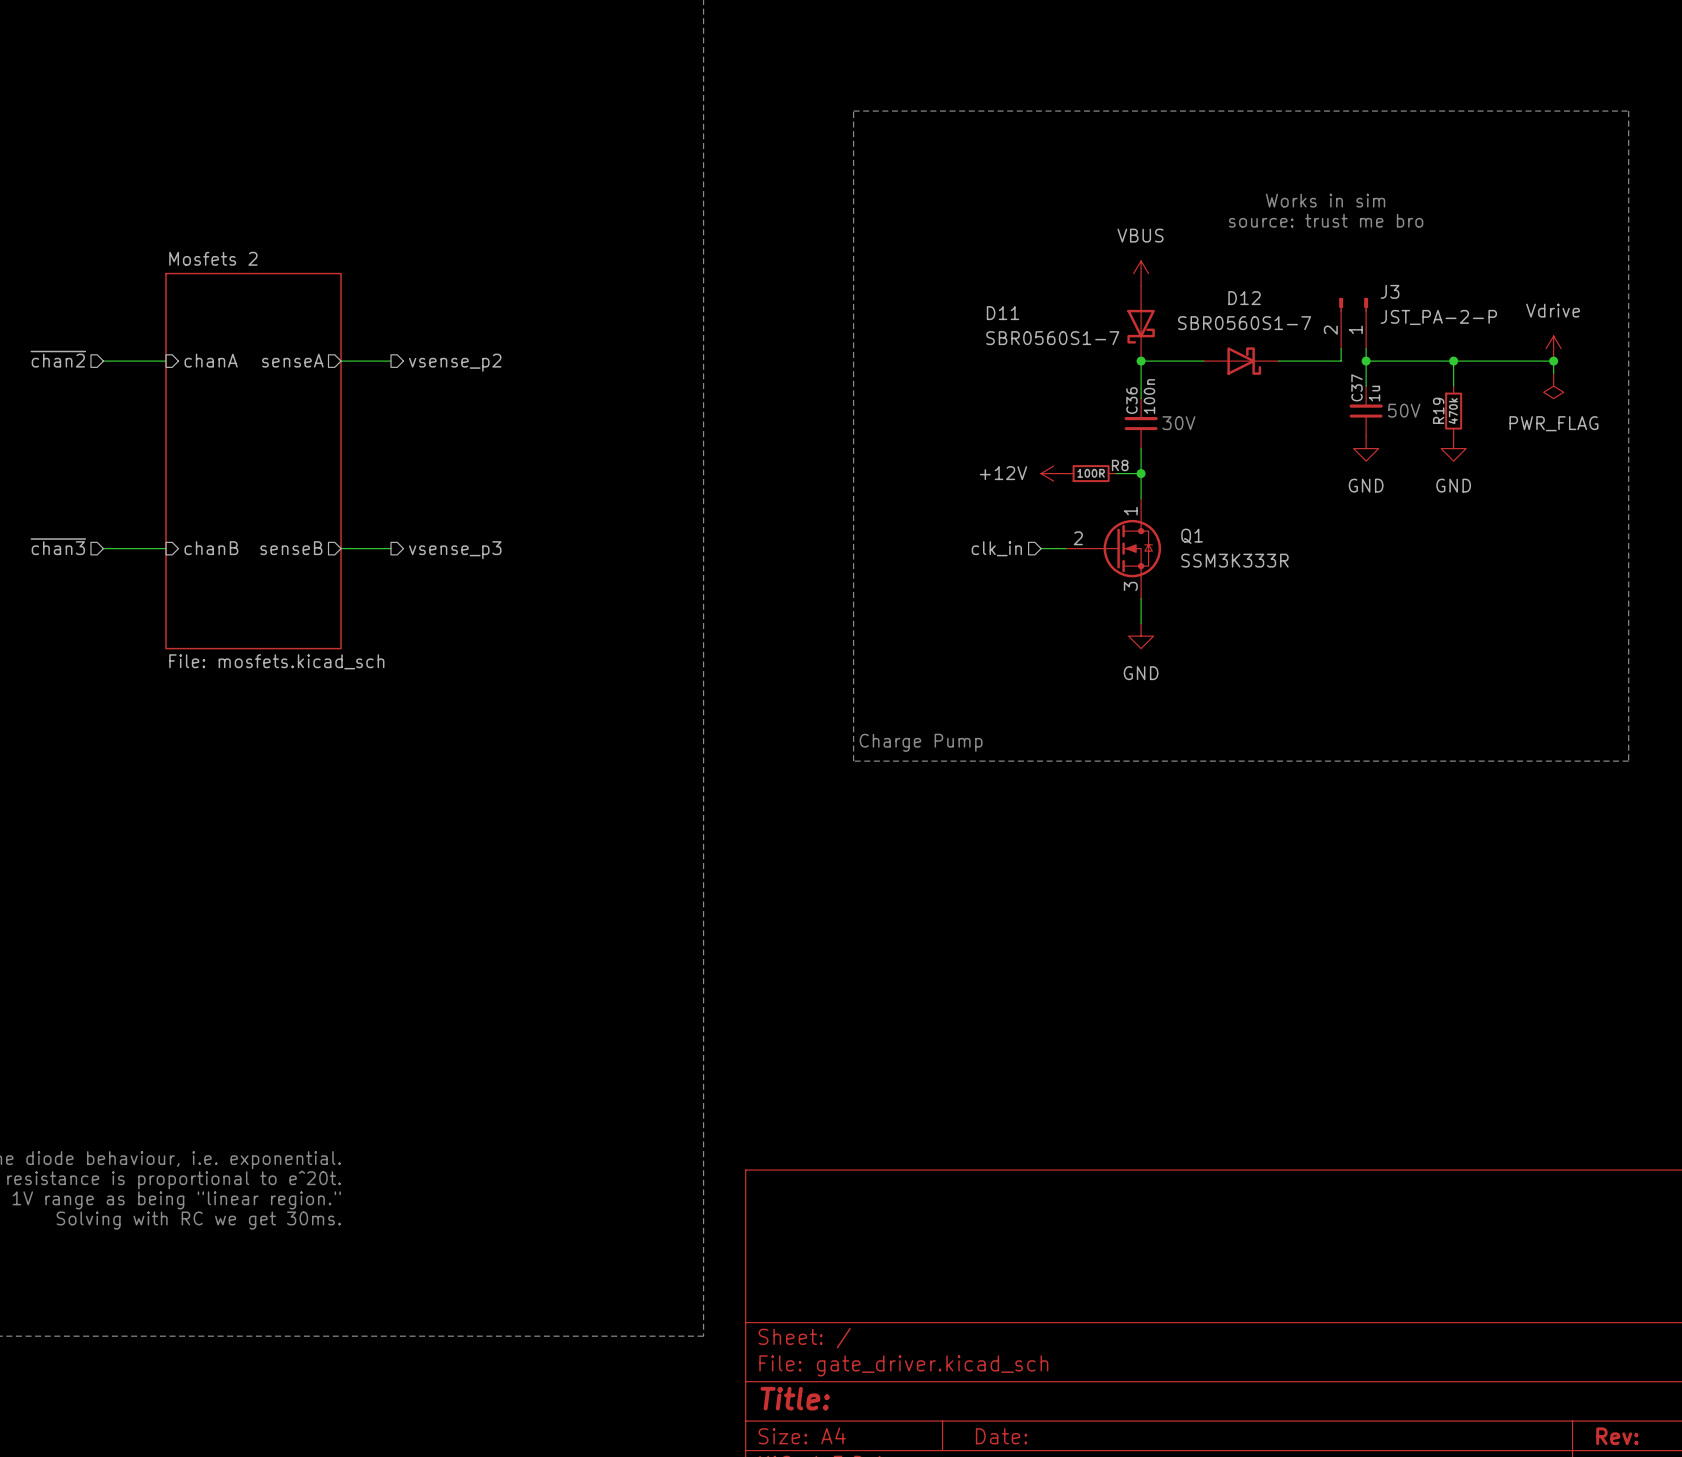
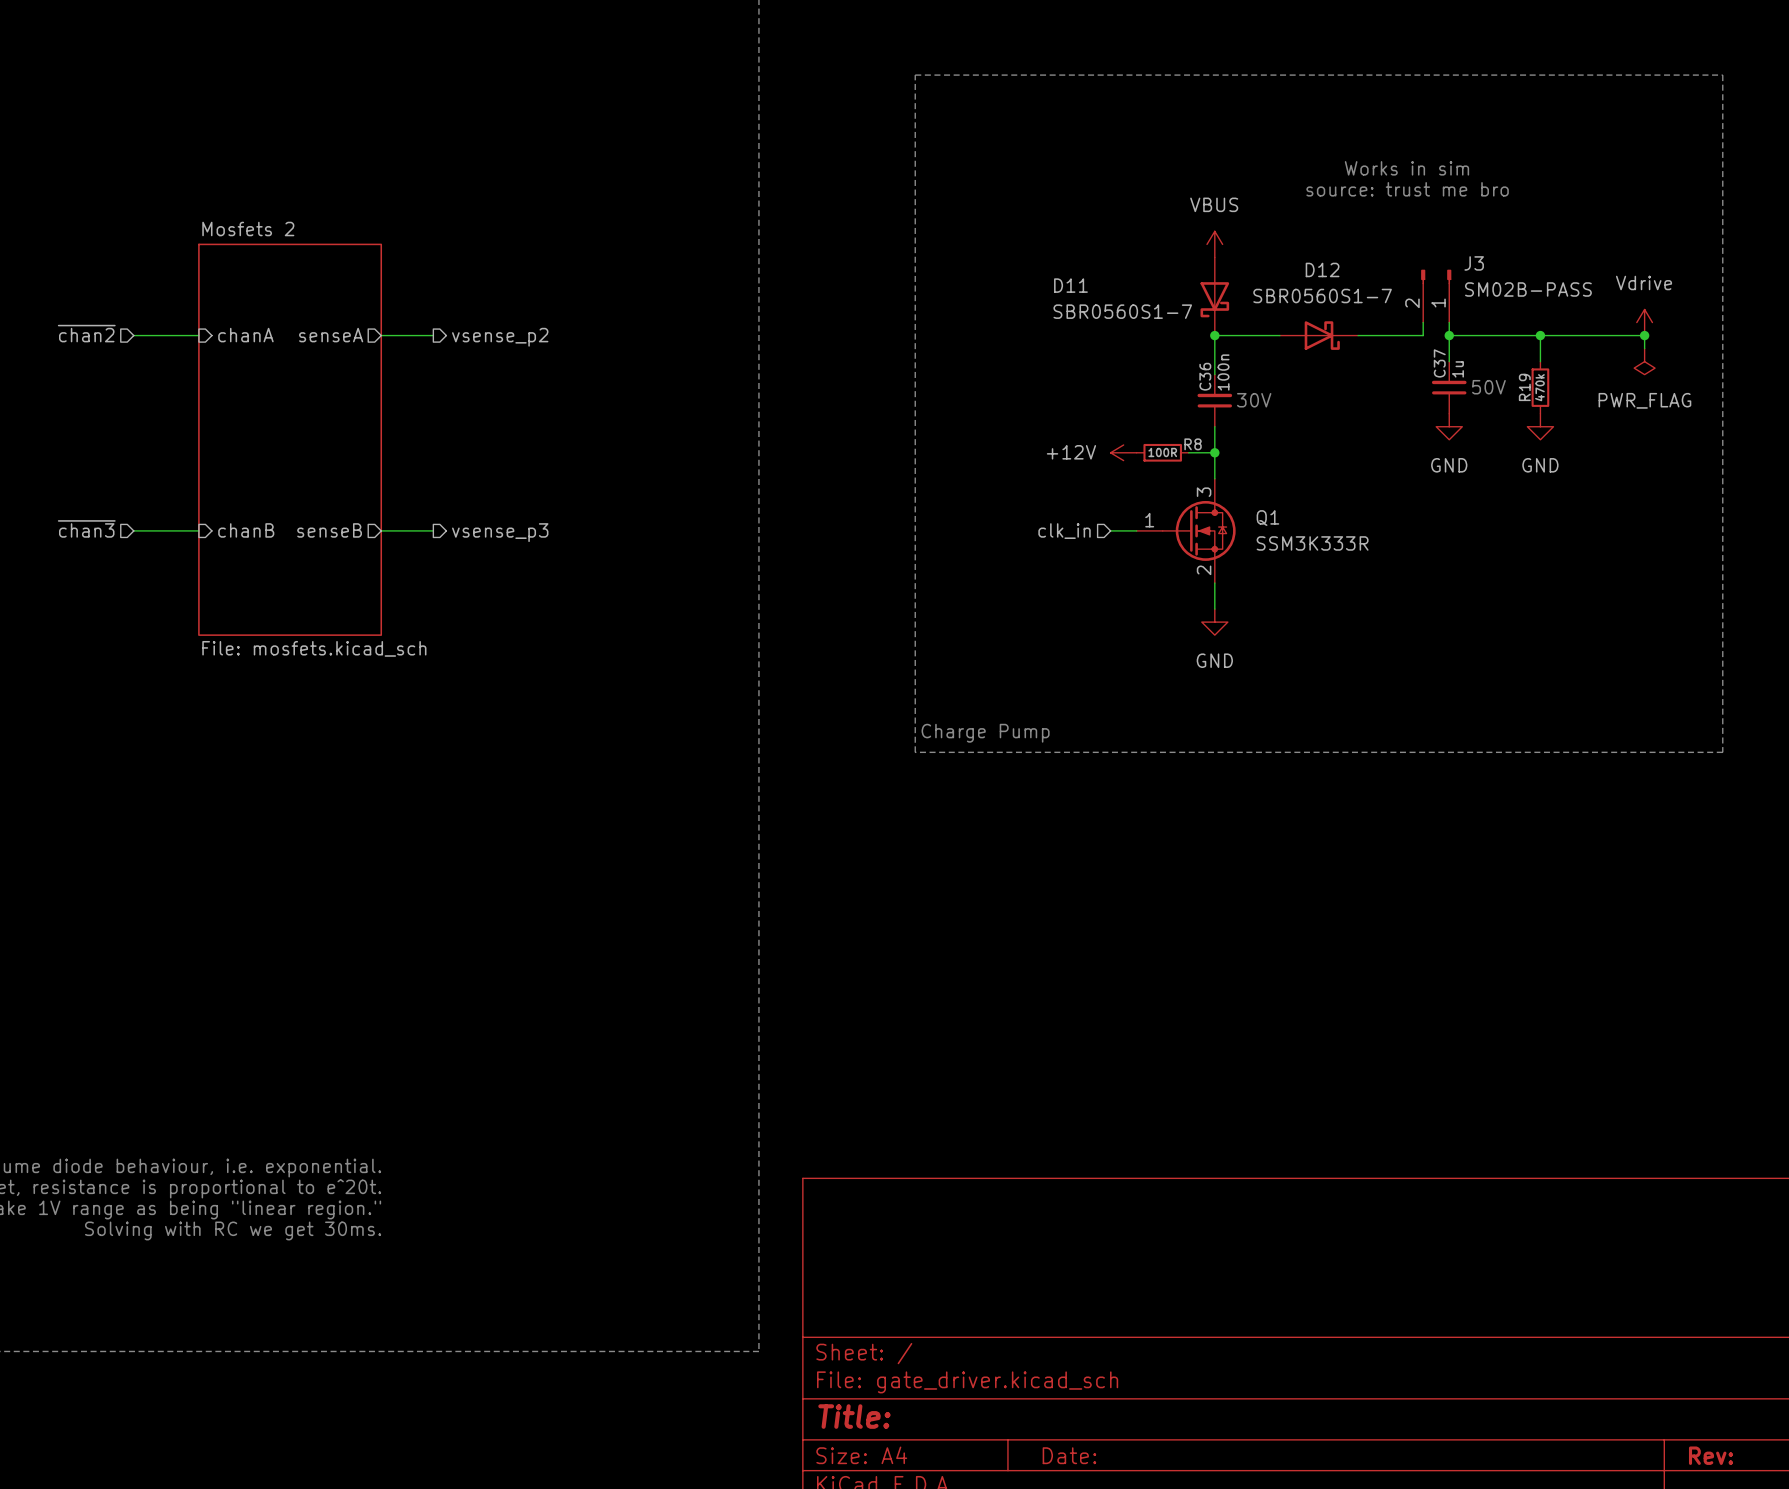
J3 value: JST_PA-2-P (1438, 317) -> SM02B-PASS (1528, 289)
Q1 pin number: 1 (1130, 511) -> 3 (1204, 492)
Q1 pin number: 2 (1078, 538) -> 1 (1149, 520)
Q1 pin number: 3 (1130, 586) -> 2 (1204, 570)

